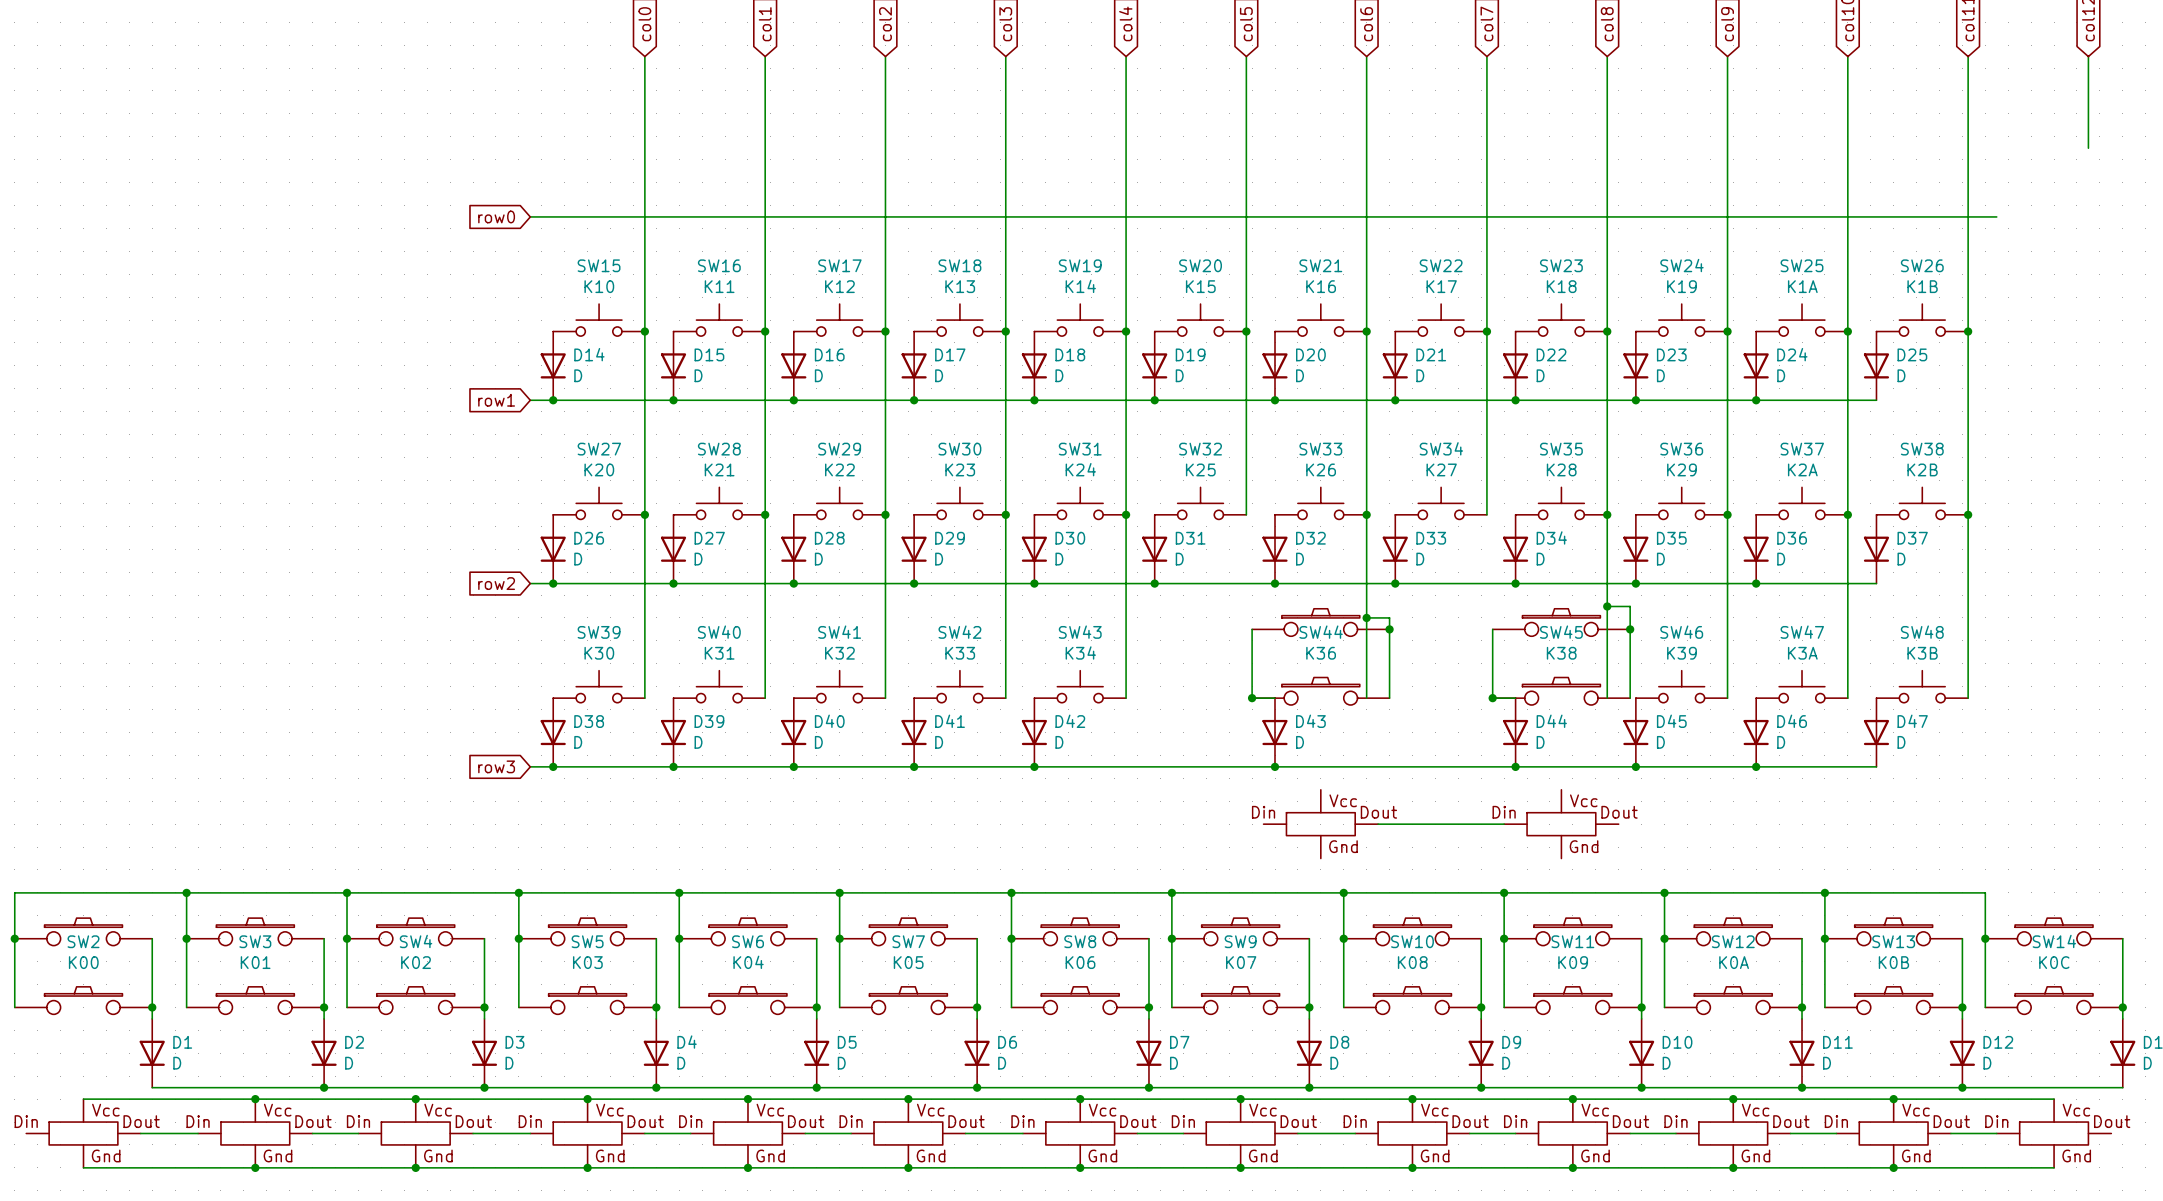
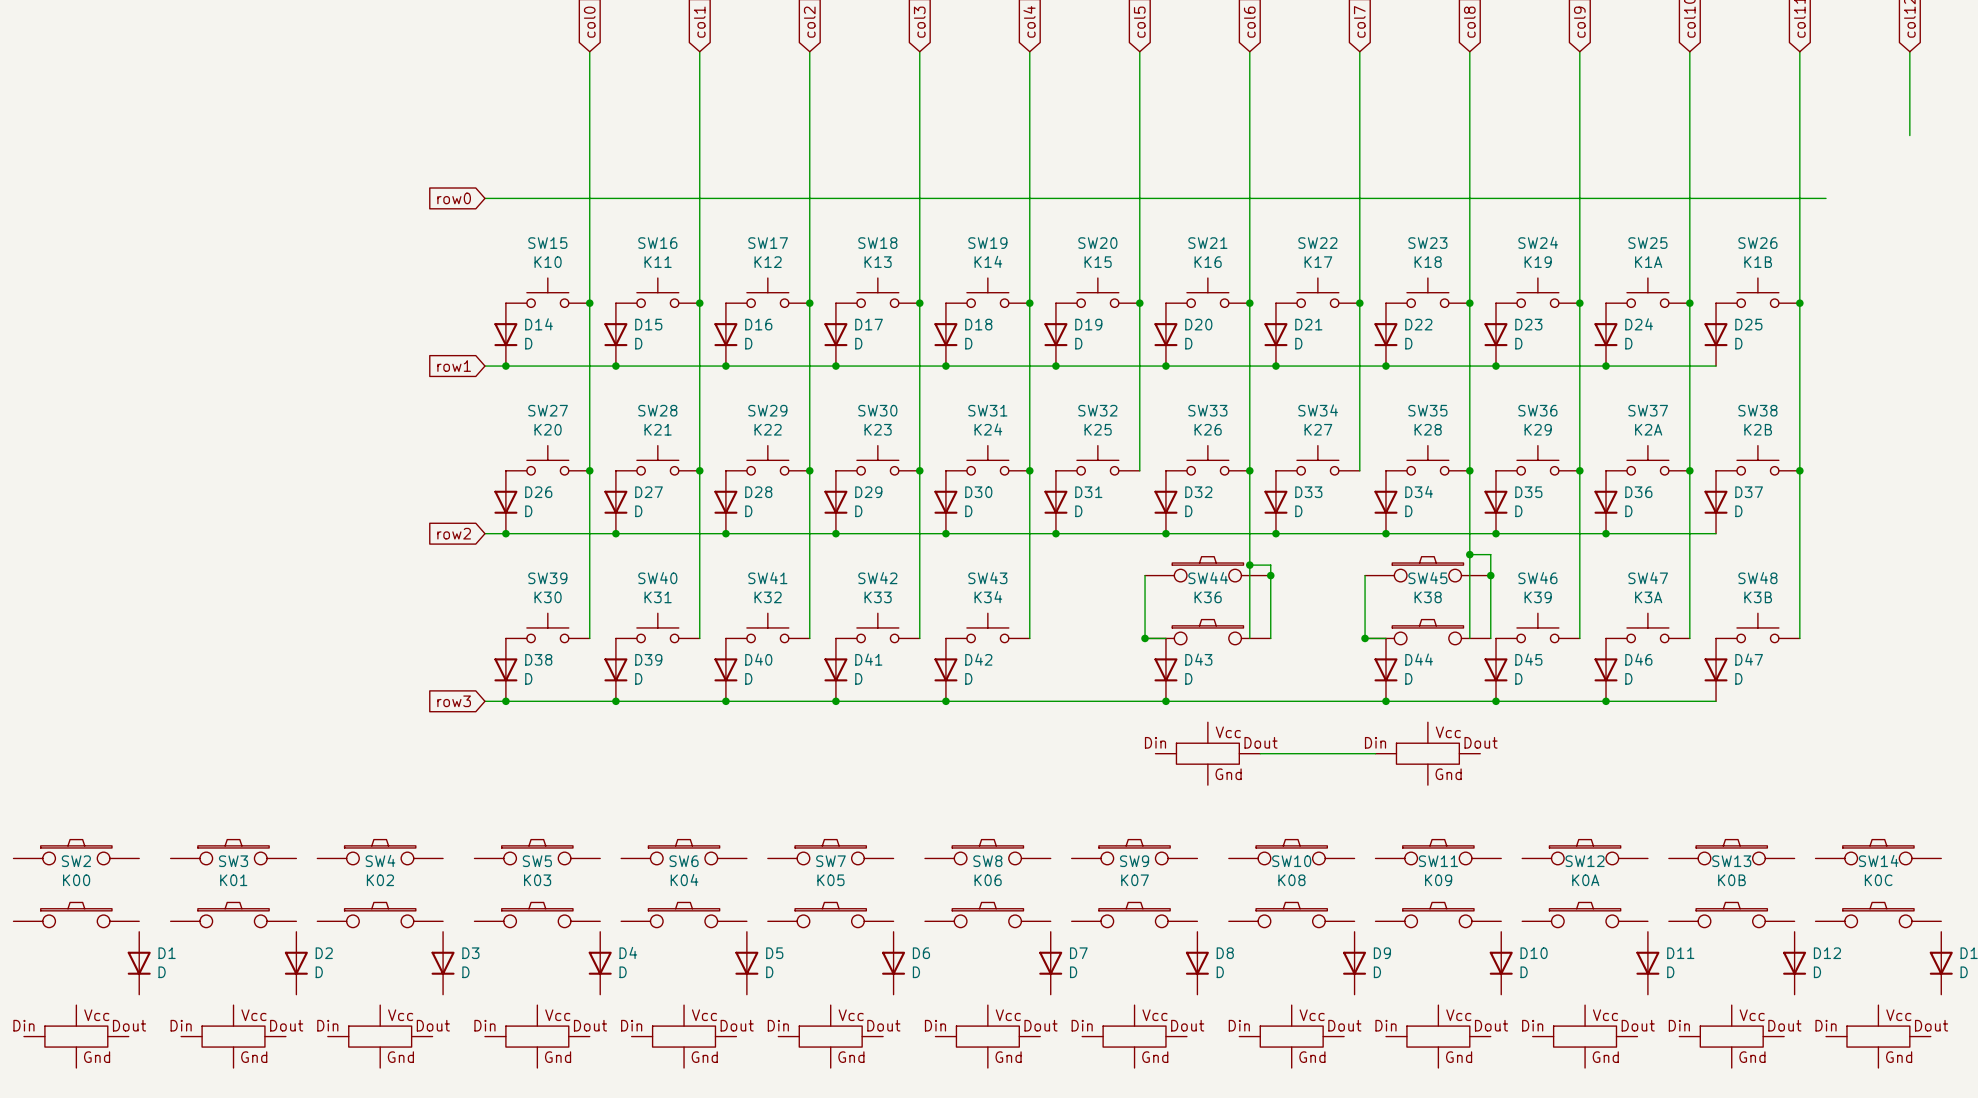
wire: (186, 892) (186, 1007) -> none
junction: (186, 892) -> none
wire: (347, 892) (347, 1007) -> none
junction: (347, 892) -> none
wire: (518, 892) (518, 1007) -> none
junction: (518, 892) -> none
wire: (679, 892) (679, 1007) -> none
junction: (679, 892) -> none
wire: (839, 892) (839, 1007) -> none
junction: (839, 892) -> none
wire: (1011, 892) (1011, 1007) -> none
junction: (1011, 892) -> none
wire: (1171, 892) (1171, 1007) -> none
junction: (1171, 892) -> none
wire: (1343, 892) (1343, 1007) -> none
junction: (1343, 892) -> none
wire: (1504, 892) (1504, 1007) -> none
junction: (1504, 892) -> none
wire: (1664, 892) (1664, 1007) -> none
junction: (1664, 892) -> none
wire: (1824, 892) (1824, 1007) -> none
junction: (1824, 892) -> none
junction: (14, 938) -> none
wire: (152, 938) (152, 1018) -> none
junction: (186, 938) -> none
wire: (324, 938) (324, 1018) -> none
junction: (347, 938) -> none
wire: (484, 938) (484, 1018) -> none
junction: (518, 938) -> none
wire: (656, 938) (656, 1018) -> none
junction: (679, 938) -> none
wire: (816, 938) (816, 1018) -> none
junction: (839, 938) -> none
wire: (977, 938) (977, 1018) -> none
junction: (1011, 938) -> none
wire: (1148, 938) (1148, 1018) -> none
junction: (1171, 938) -> none
wire: (1309, 938) (1309, 1018) -> none
junction: (1343, 938) -> none
wire: (1481, 938) (1481, 1018) -> none
junction: (1504, 938) -> none
wire: (1641, 938) (1641, 1018) -> none
junction: (1664, 938) -> none
wire: (1802, 938) (1802, 1018) -> none
junction: (1824, 938) -> none
wire: (1962, 938) (1962, 1018) -> none
junction: (1985, 938) -> none
wire: (2122, 938) (2122, 1018) -> none
wire: (14, 1007) (14, 892) (1985, 892) (1985, 1007) -> none
junction: (152, 1007) -> none
junction: (324, 1007) -> none
junction: (484, 1007) -> none
junction: (656, 1007) -> none
junction: (816, 1007) -> none
junction: (977, 1007) -> none
junction: (1148, 1007) -> none
junction: (1309, 1007) -> none
junction: (1481, 1007) -> none
junction: (1641, 1007) -> none
junction: (1802, 1007) -> none
junction: (1962, 1007) -> none
junction: (2122, 1007) -> none
wire: (152, 1087) (2122, 1087) -> none
junction: (324, 1087) -> none
junction: (484, 1087) -> none
junction: (656, 1087) -> none
junction: (816, 1087) -> none
junction: (977, 1087) -> none
junction: (1148, 1087) -> none
junction: (1309, 1087) -> none
junction: (1481, 1087) -> none
junction: (1641, 1087) -> none
junction: (1802, 1087) -> none
junction: (1962, 1087) -> none
wire: (83, 1099) (2054, 1099) -> none
junction: (255, 1099) -> none
junction: (415, 1099) -> none
junction: (587, 1099) -> none
junction: (747, 1099) -> none
junction: (908, 1099) -> none
junction: (1080, 1099) -> none
junction: (1240, 1099) -> none
junction: (1412, 1099) -> none
junction: (1572, 1099) -> none
junction: (1733, 1099) -> none
junction: (1893, 1099) -> none
wire: (140, 1133) (198, 1133) -> none
wire: (312, 1133) (358, 1133) -> none
wire: (473, 1133) (530, 1133) -> none
wire: (644, 1133) (690, 1133) -> none
wire: (805, 1133) (851, 1133) -> none
wire: (965, 1133) (1022, 1133) -> none
wire: (1137, 1133) (1183, 1133) -> none
wire: (1297, 1133) (1355, 1133) -> none
wire: (1469, 1133) (1515, 1133) -> none
wire: (1630, 1133) (1675, 1133) -> none
wire: (1790, 1133) (1836, 1133) -> none
wire: (1950, 1133) (1996, 1133) -> none
wire: (83, 1167) (2054, 1167) -> none
junction: (255, 1167) -> none
junction: (415, 1167) -> none
junction: (587, 1167) -> none
junction: (747, 1167) -> none
junction: (908, 1167) -> none
junction: (1080, 1167) -> none
junction: (1240, 1167) -> none
junction: (1412, 1167) -> none
junction: (1572, 1167) -> none
junction: (1733, 1167) -> none
junction: (1893, 1167) -> none

